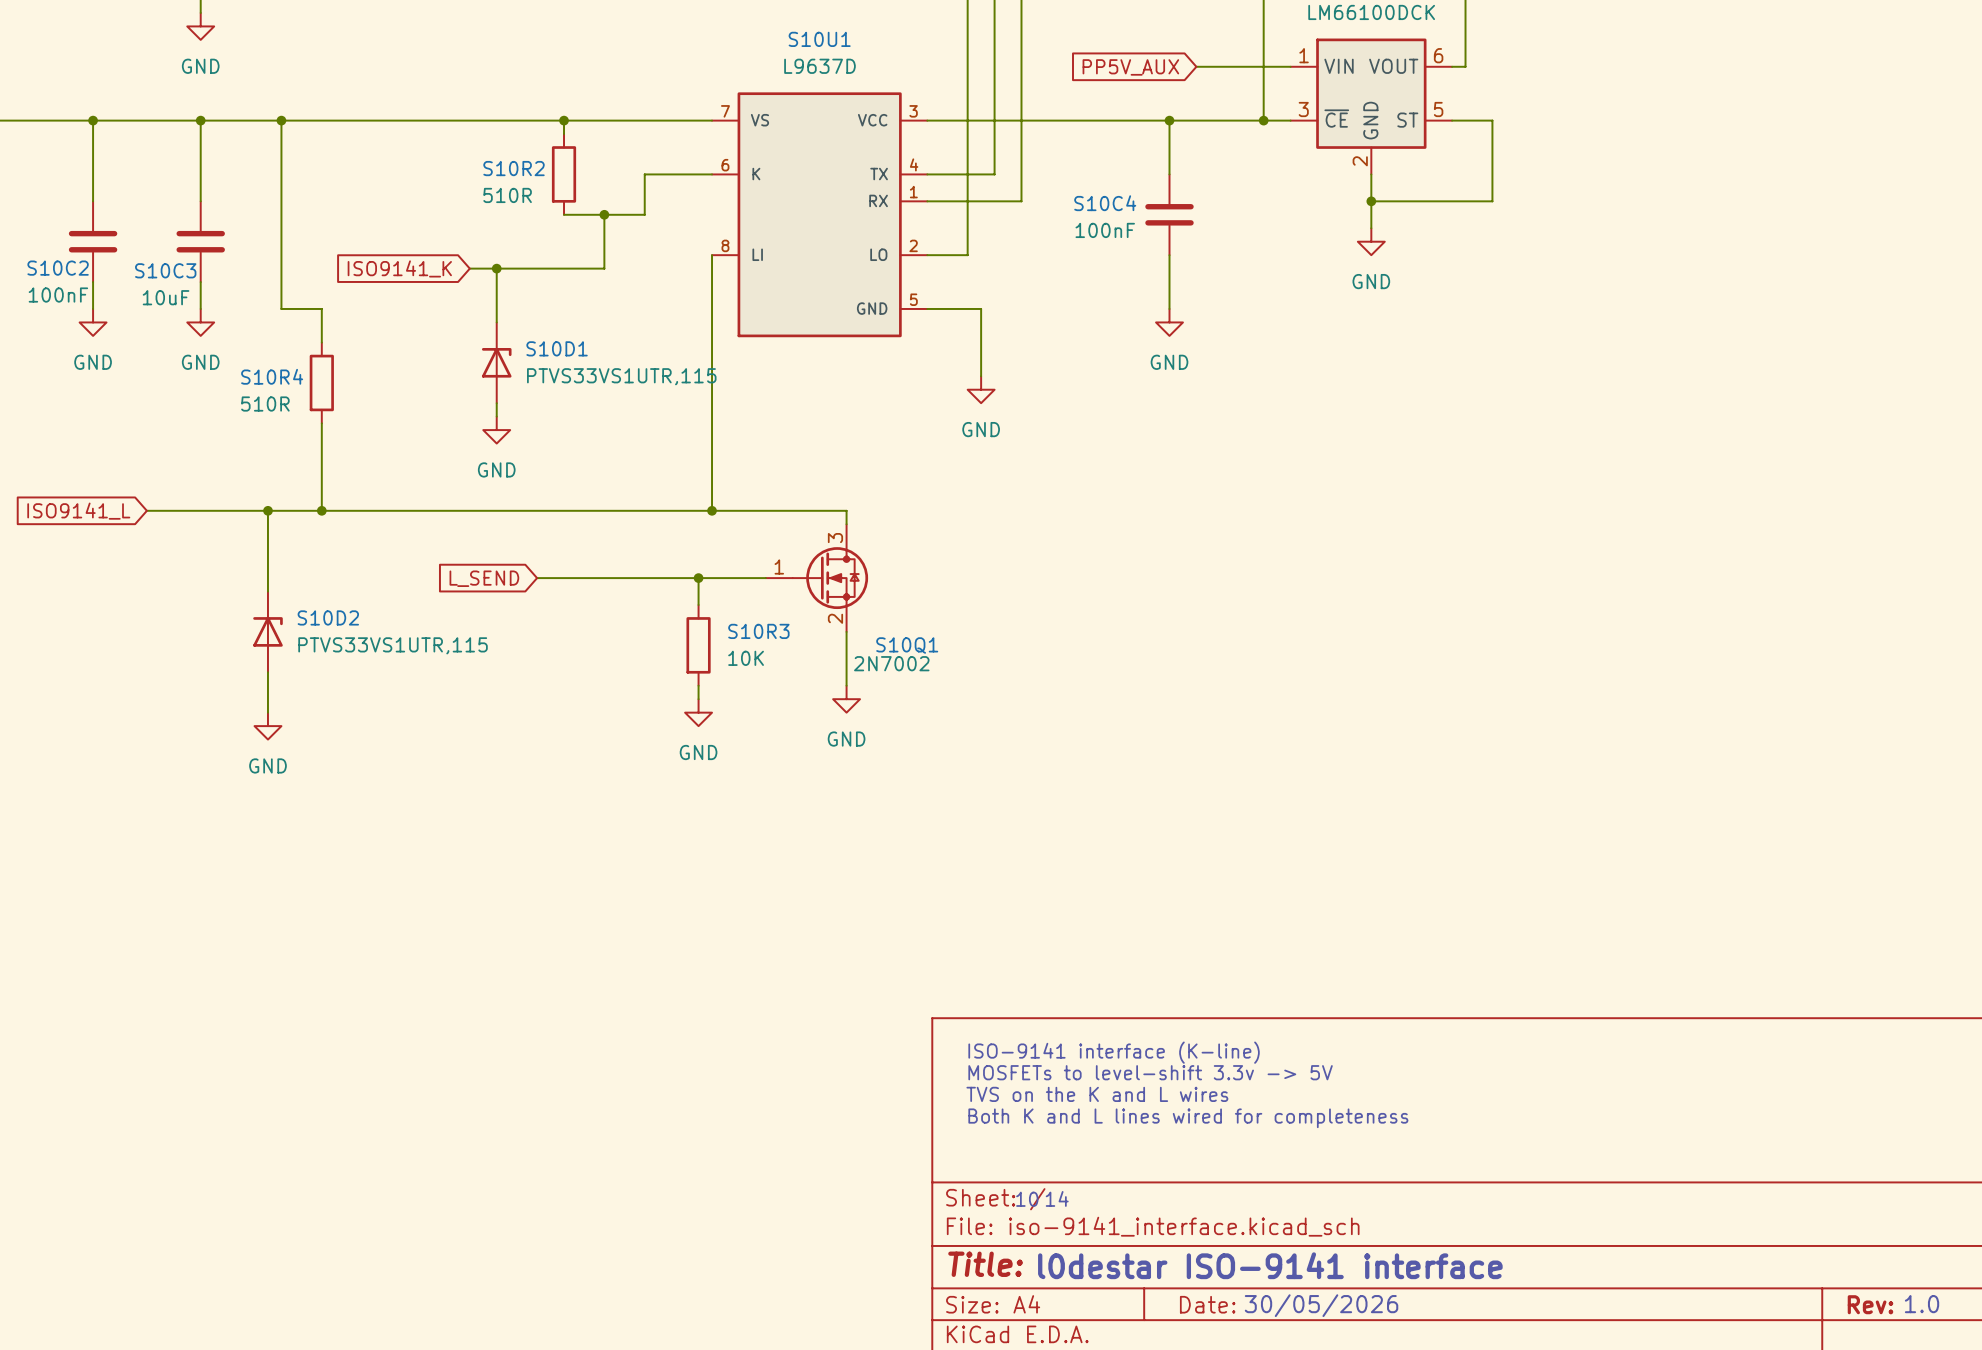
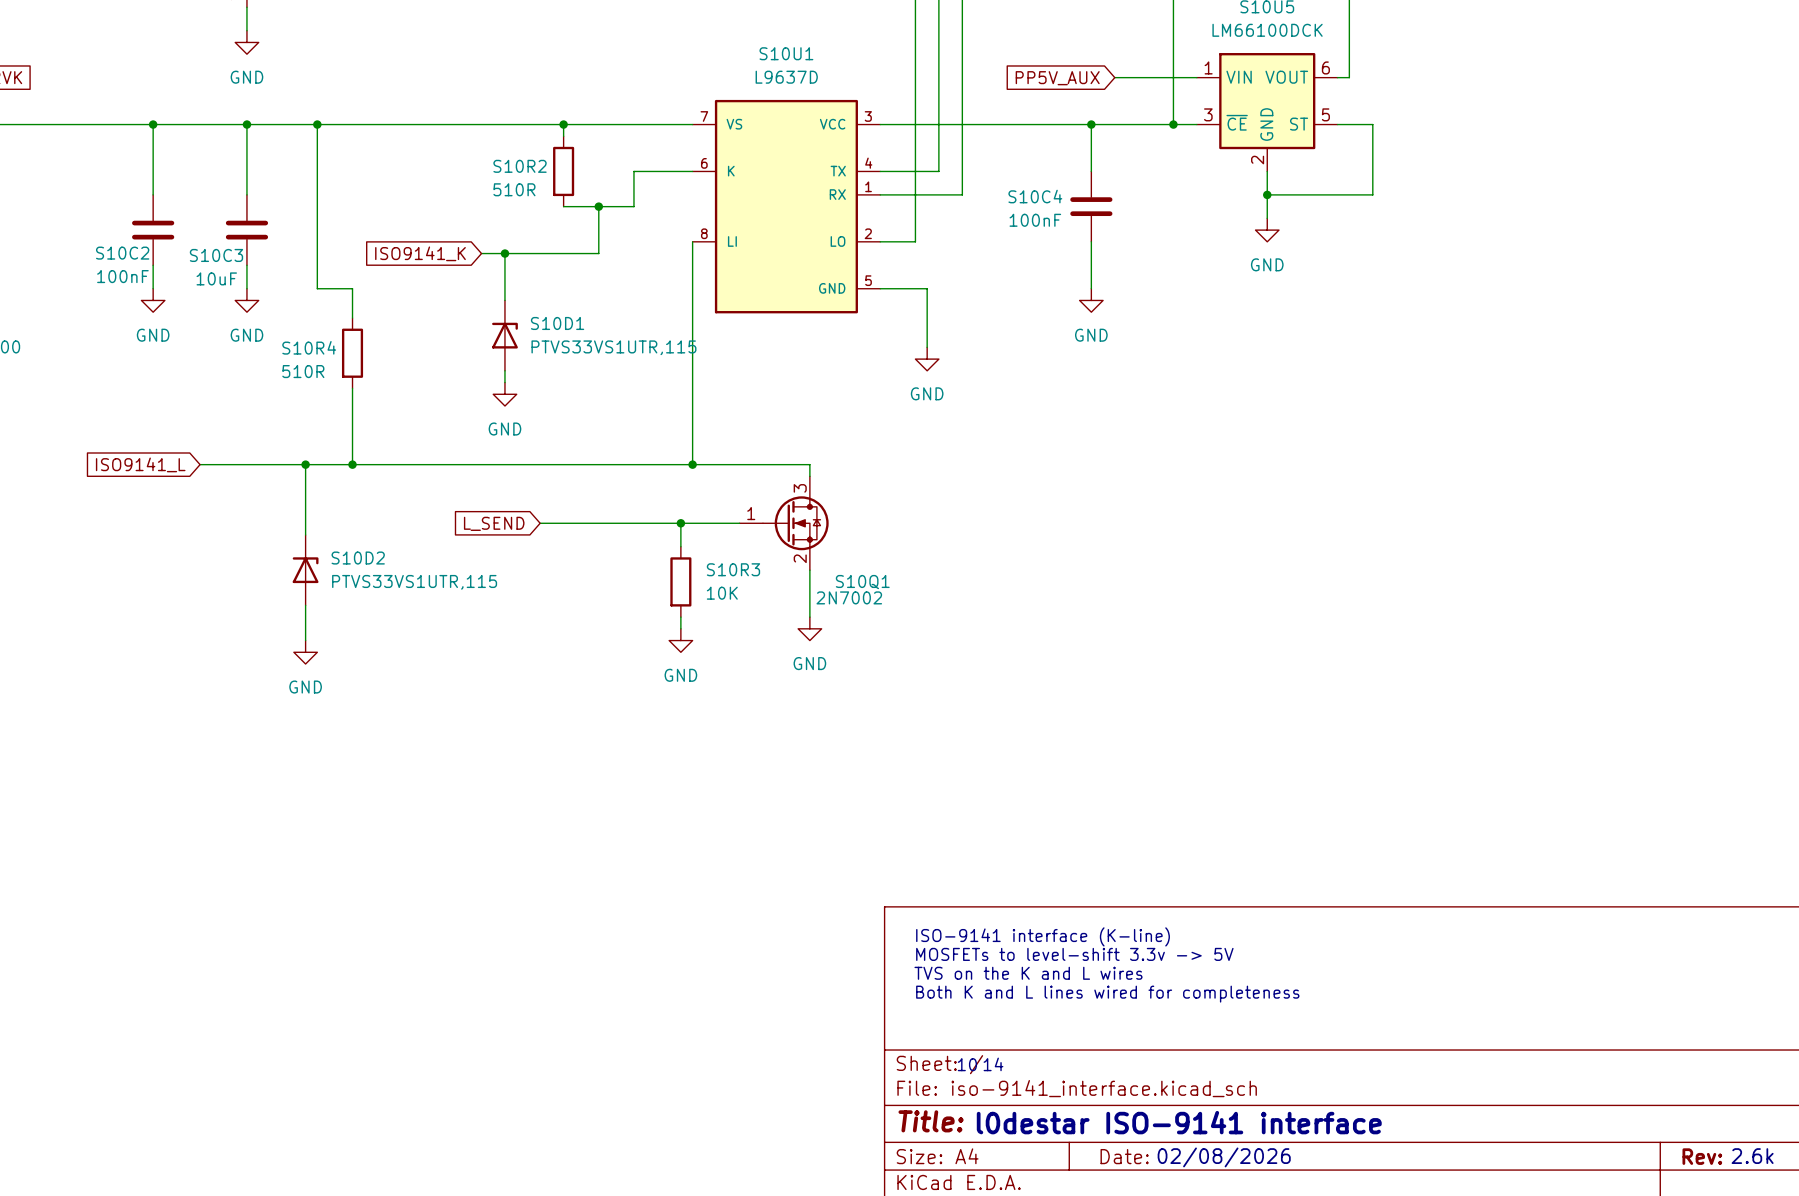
text: 1.0 (1922, 1304) -> 2.6k (1752, 1156)
text: 30/05/2026 (1321, 1305) -> 02/08/2026 (1224, 1157)

